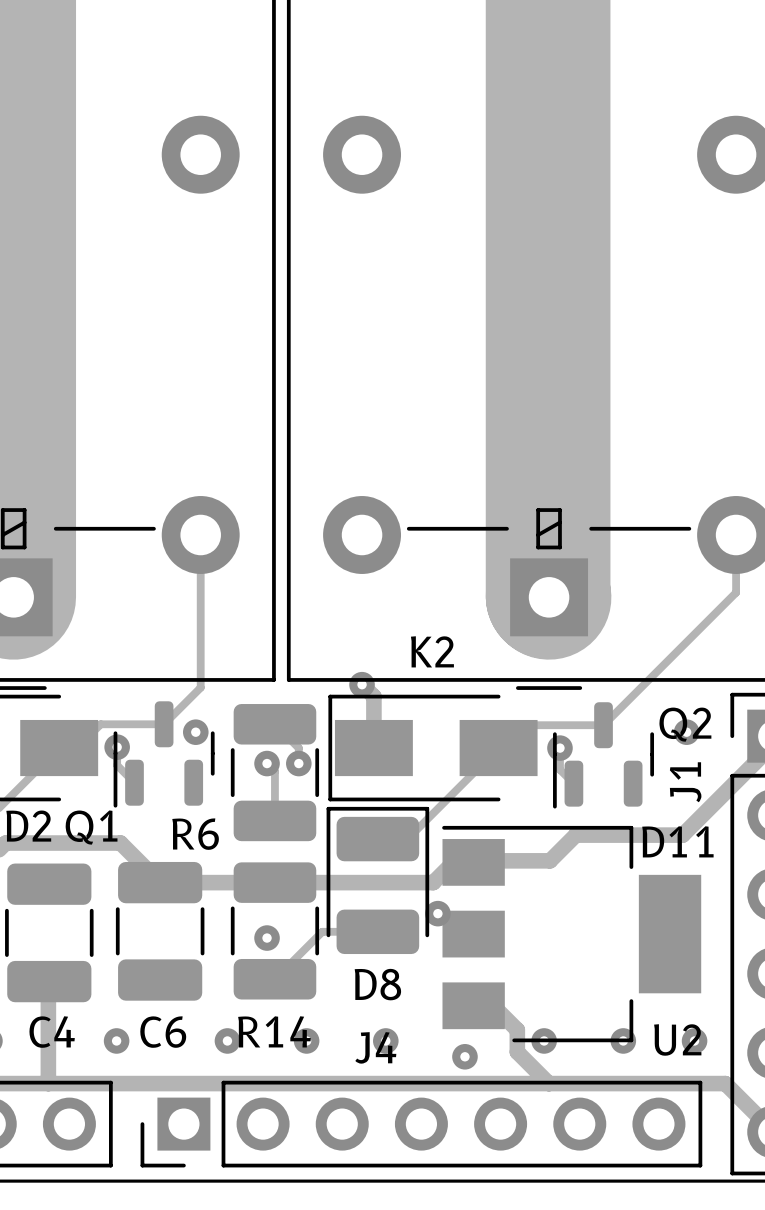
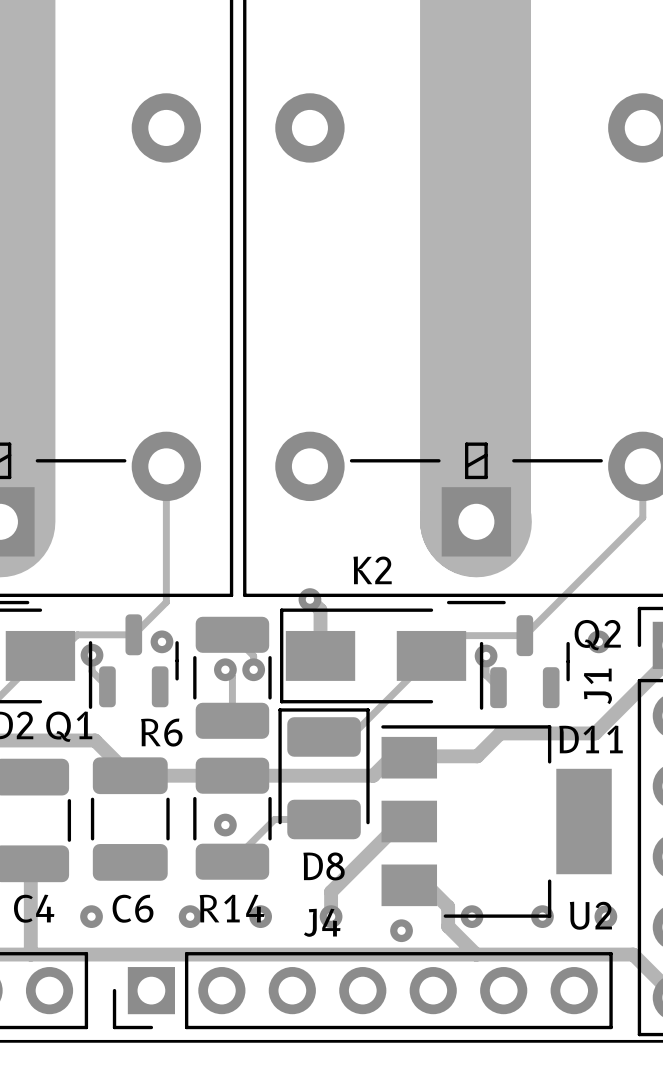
via: (437, 913) -> none
track: none -> (409, 821) (401, 821) (331, 891) (331, 916)

